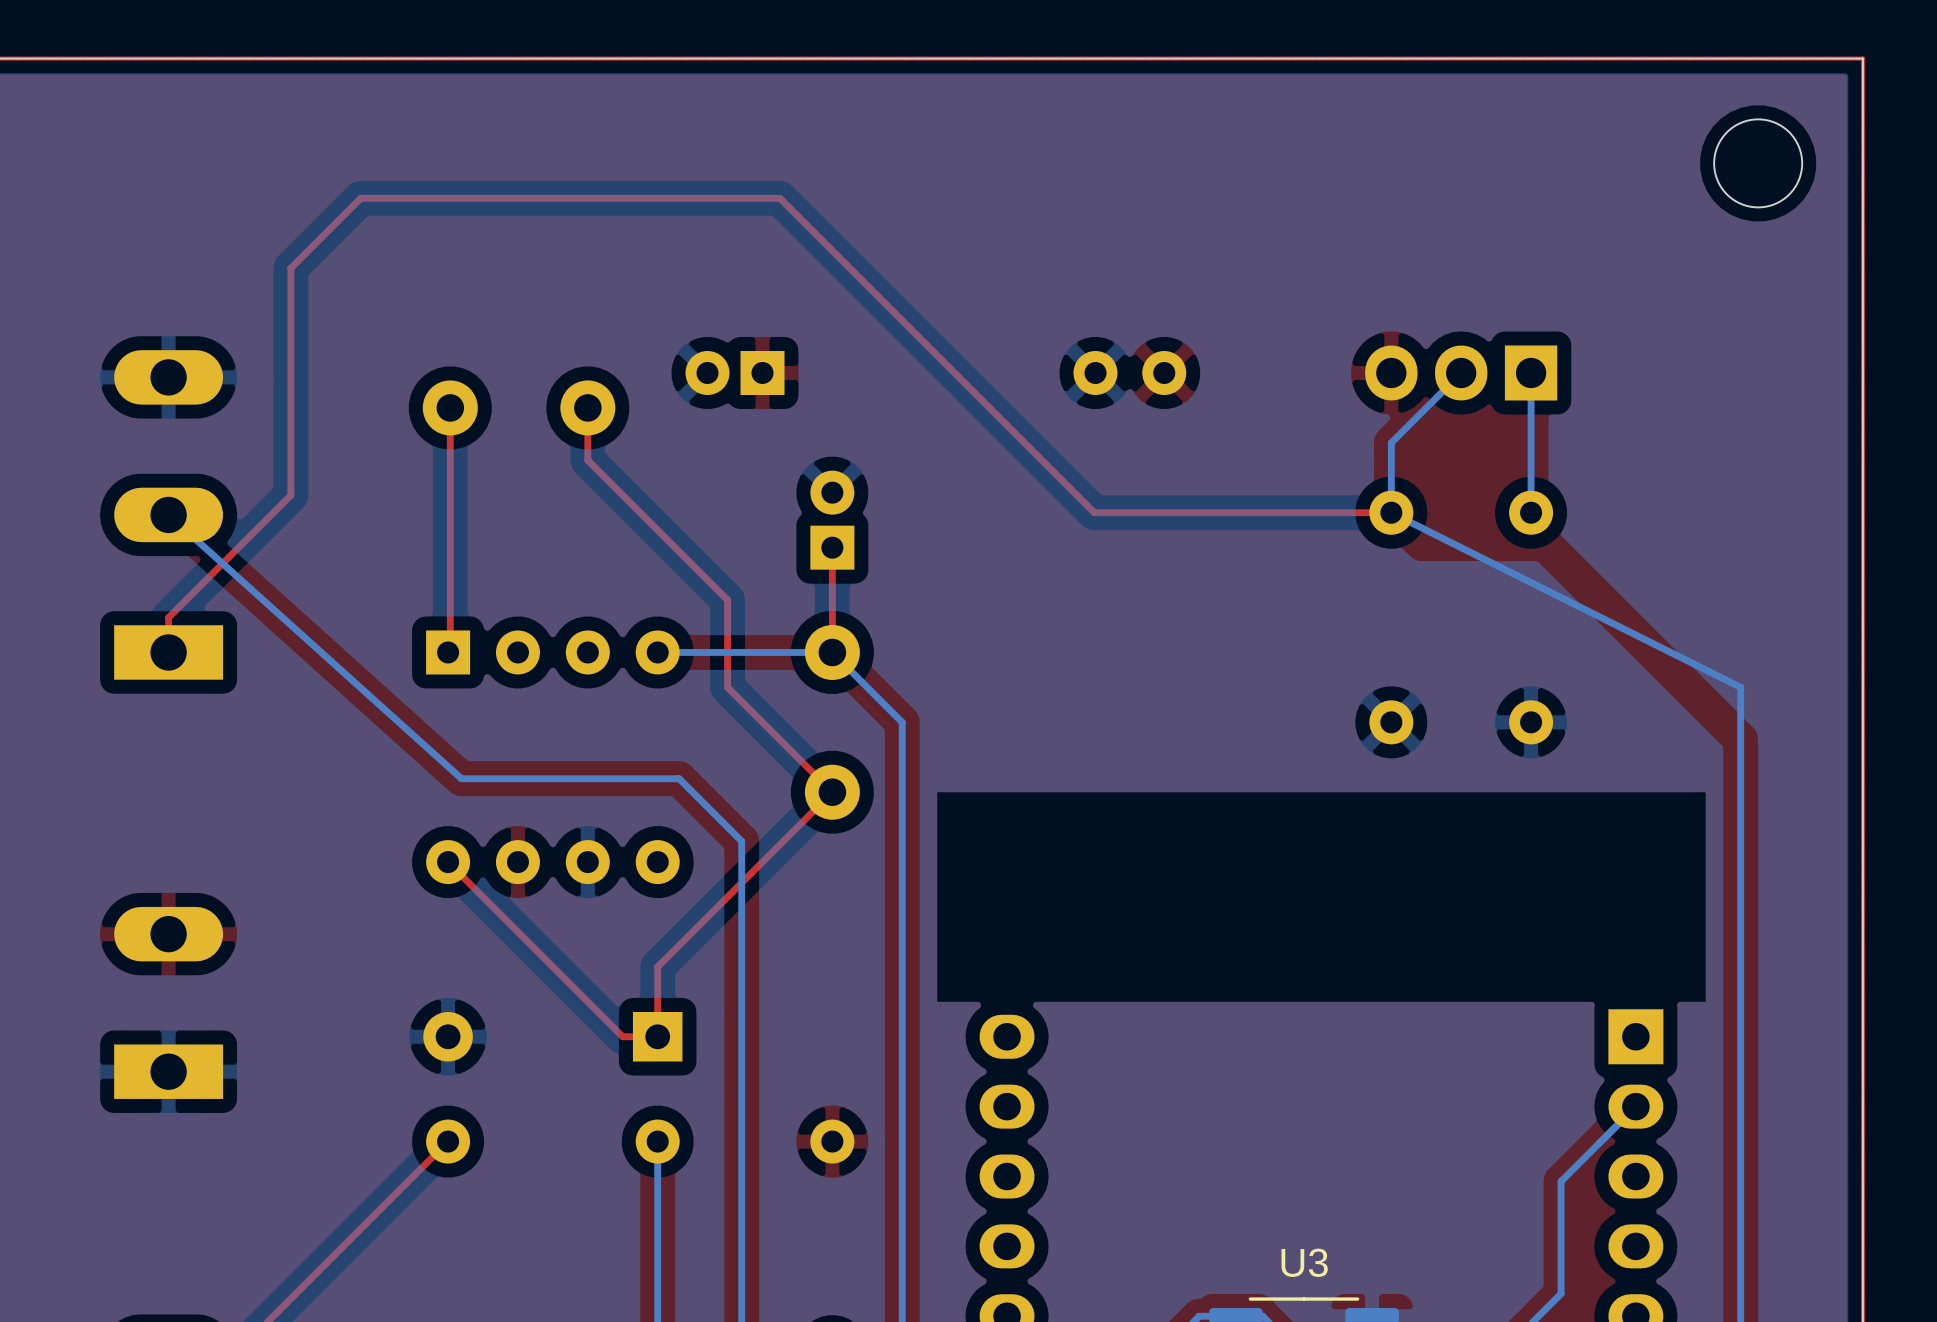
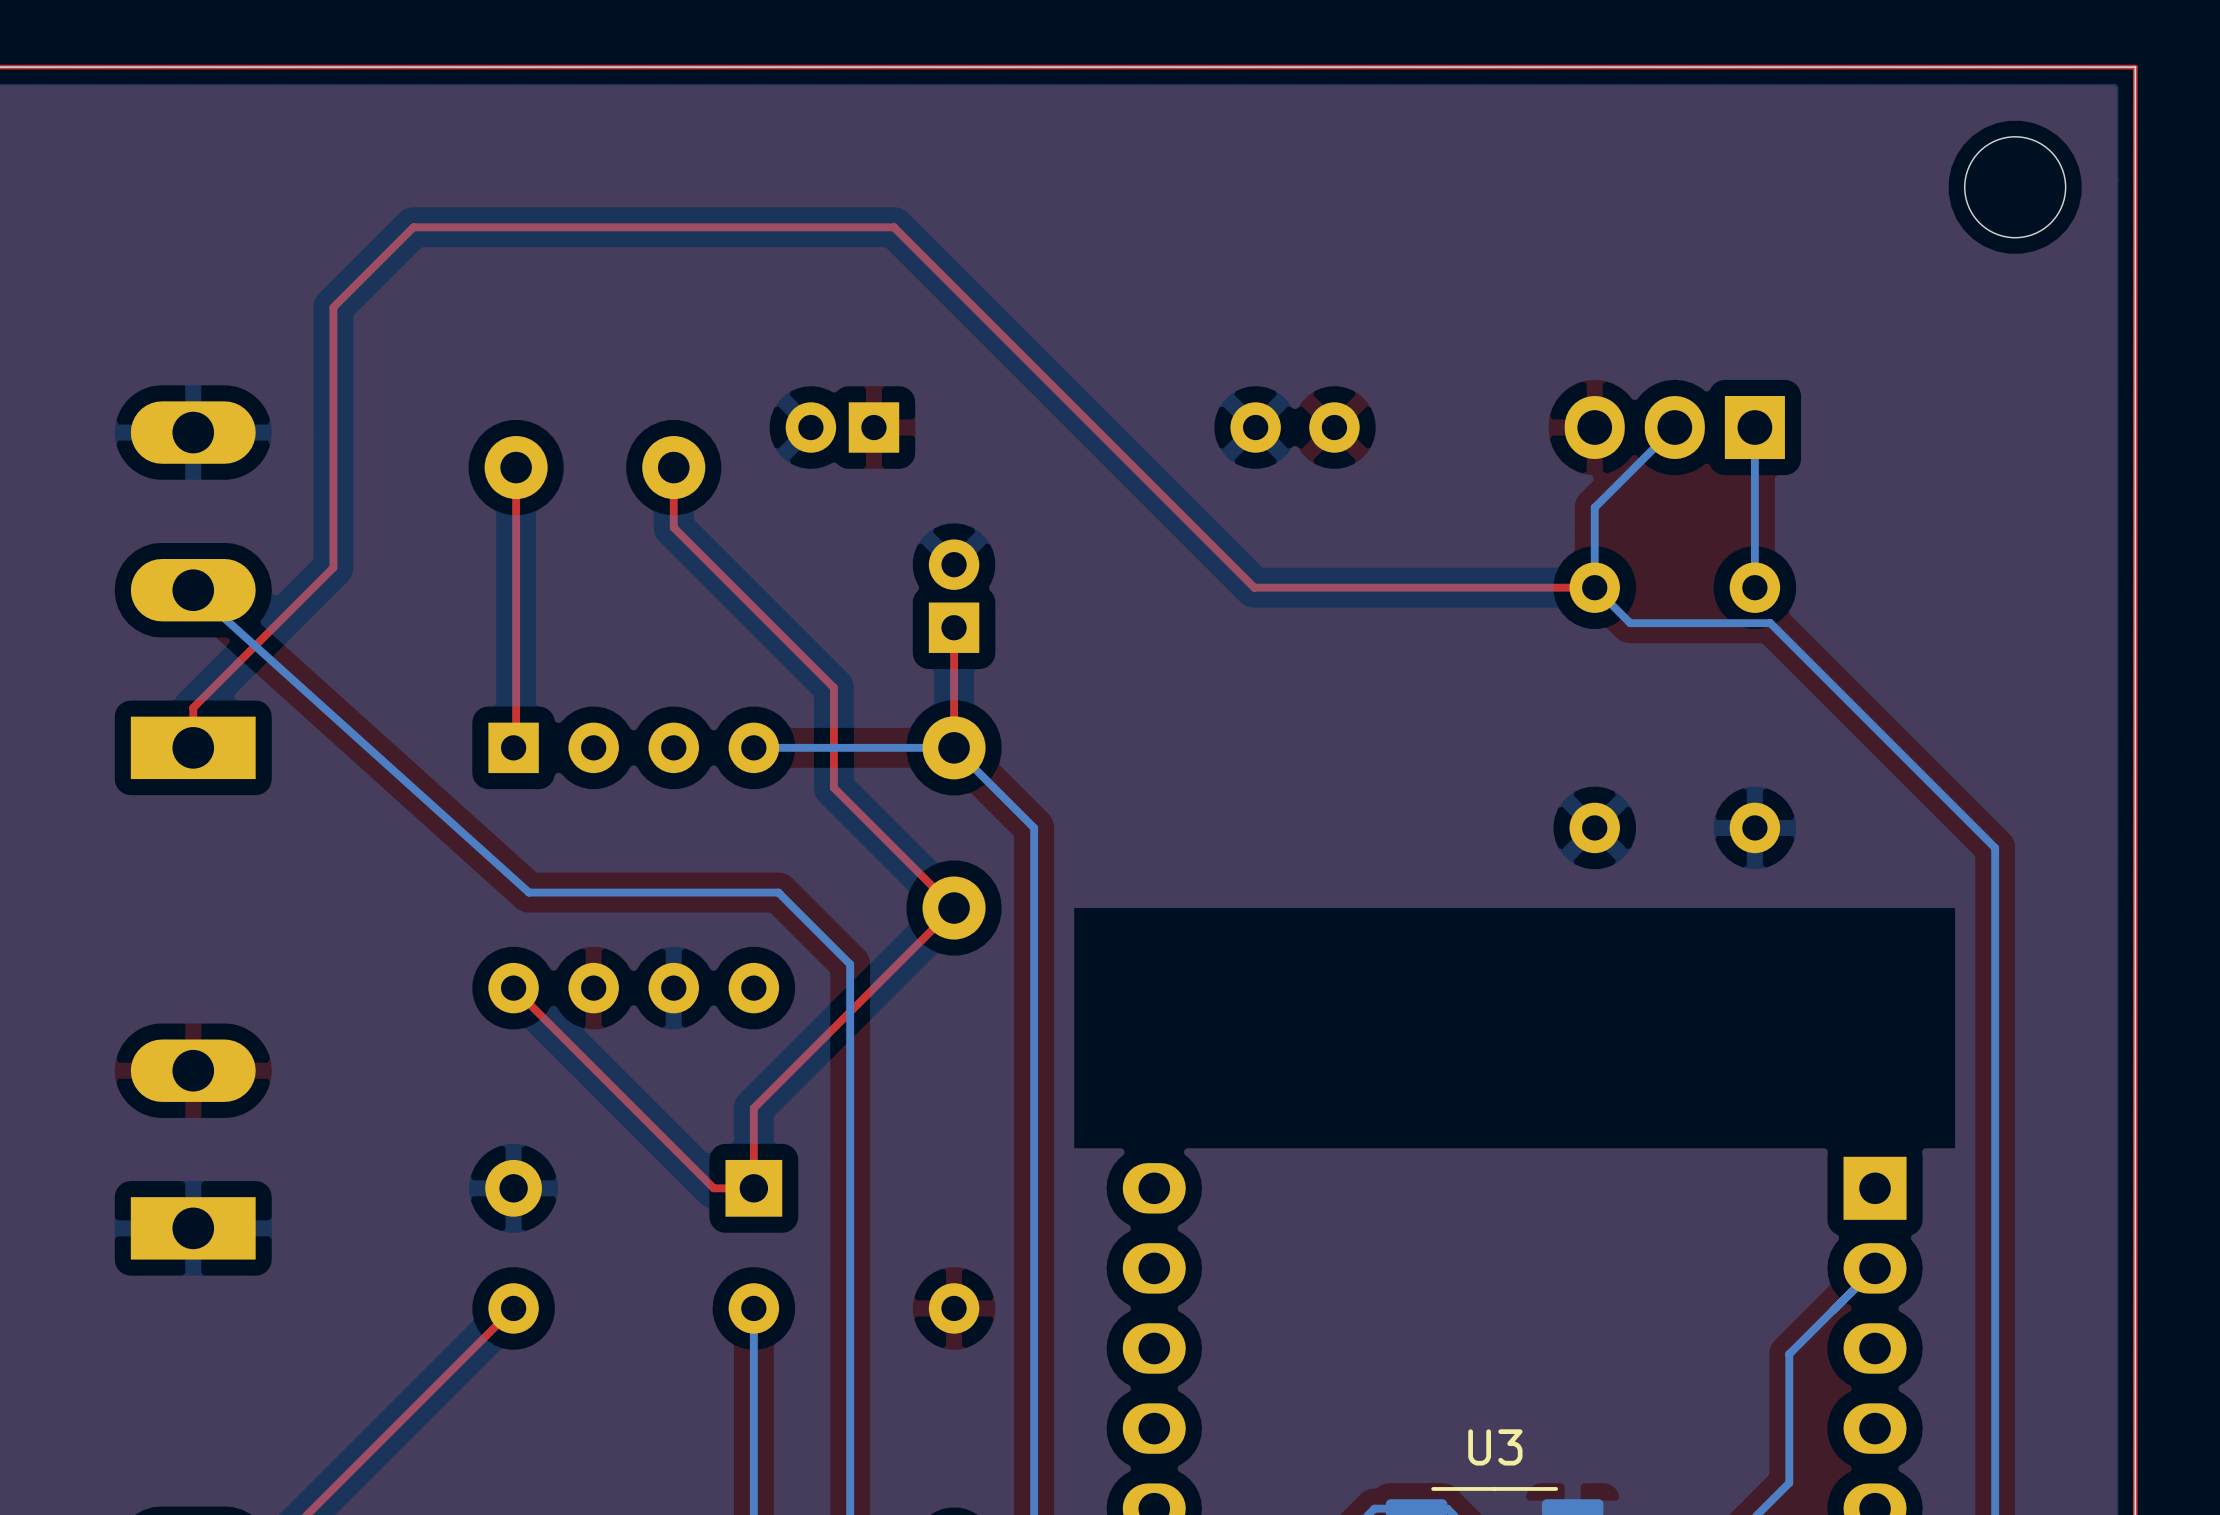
bottom track: (1391, 512) (1740, 687) (1740, 739) -> (1594, 587) (1630, 623) (1770, 623) (1995, 847)

